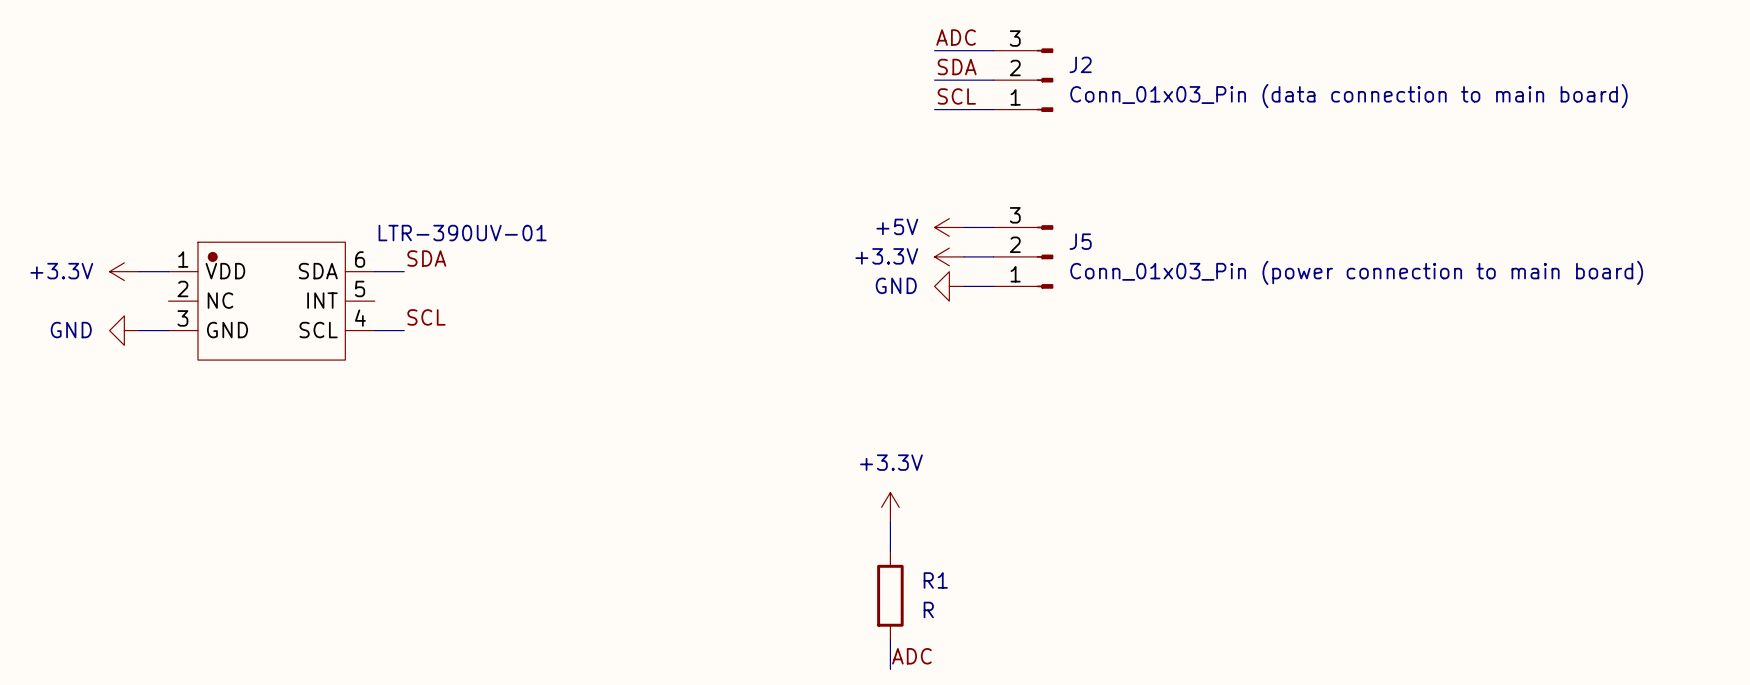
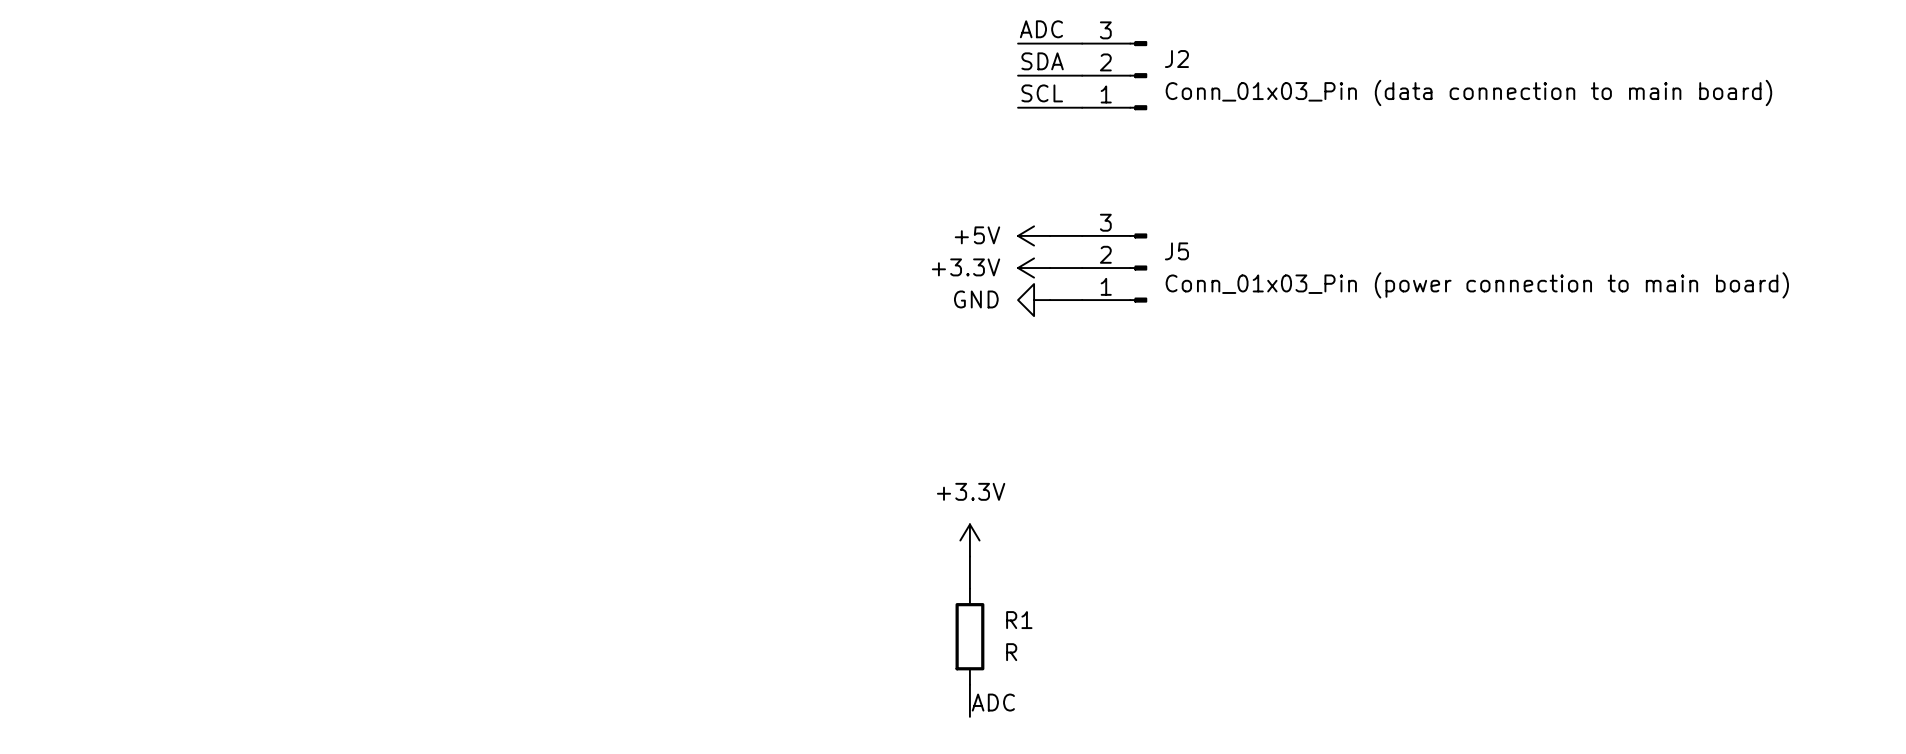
label: SDA (426, 258) -> none
power symbol: +3.3V (124, 271) -> none
wire: (139, 271) (168, 271) -> none
wire: (374, 271) (404, 271) -> none
LTR-390UV-01: (271, 301) -> none
label: SCL (426, 317) -> none
power symbol: GND (124, 330) -> none
wire: (139, 330) (168, 330) -> none
wire: (374, 330) (404, 330) -> none

